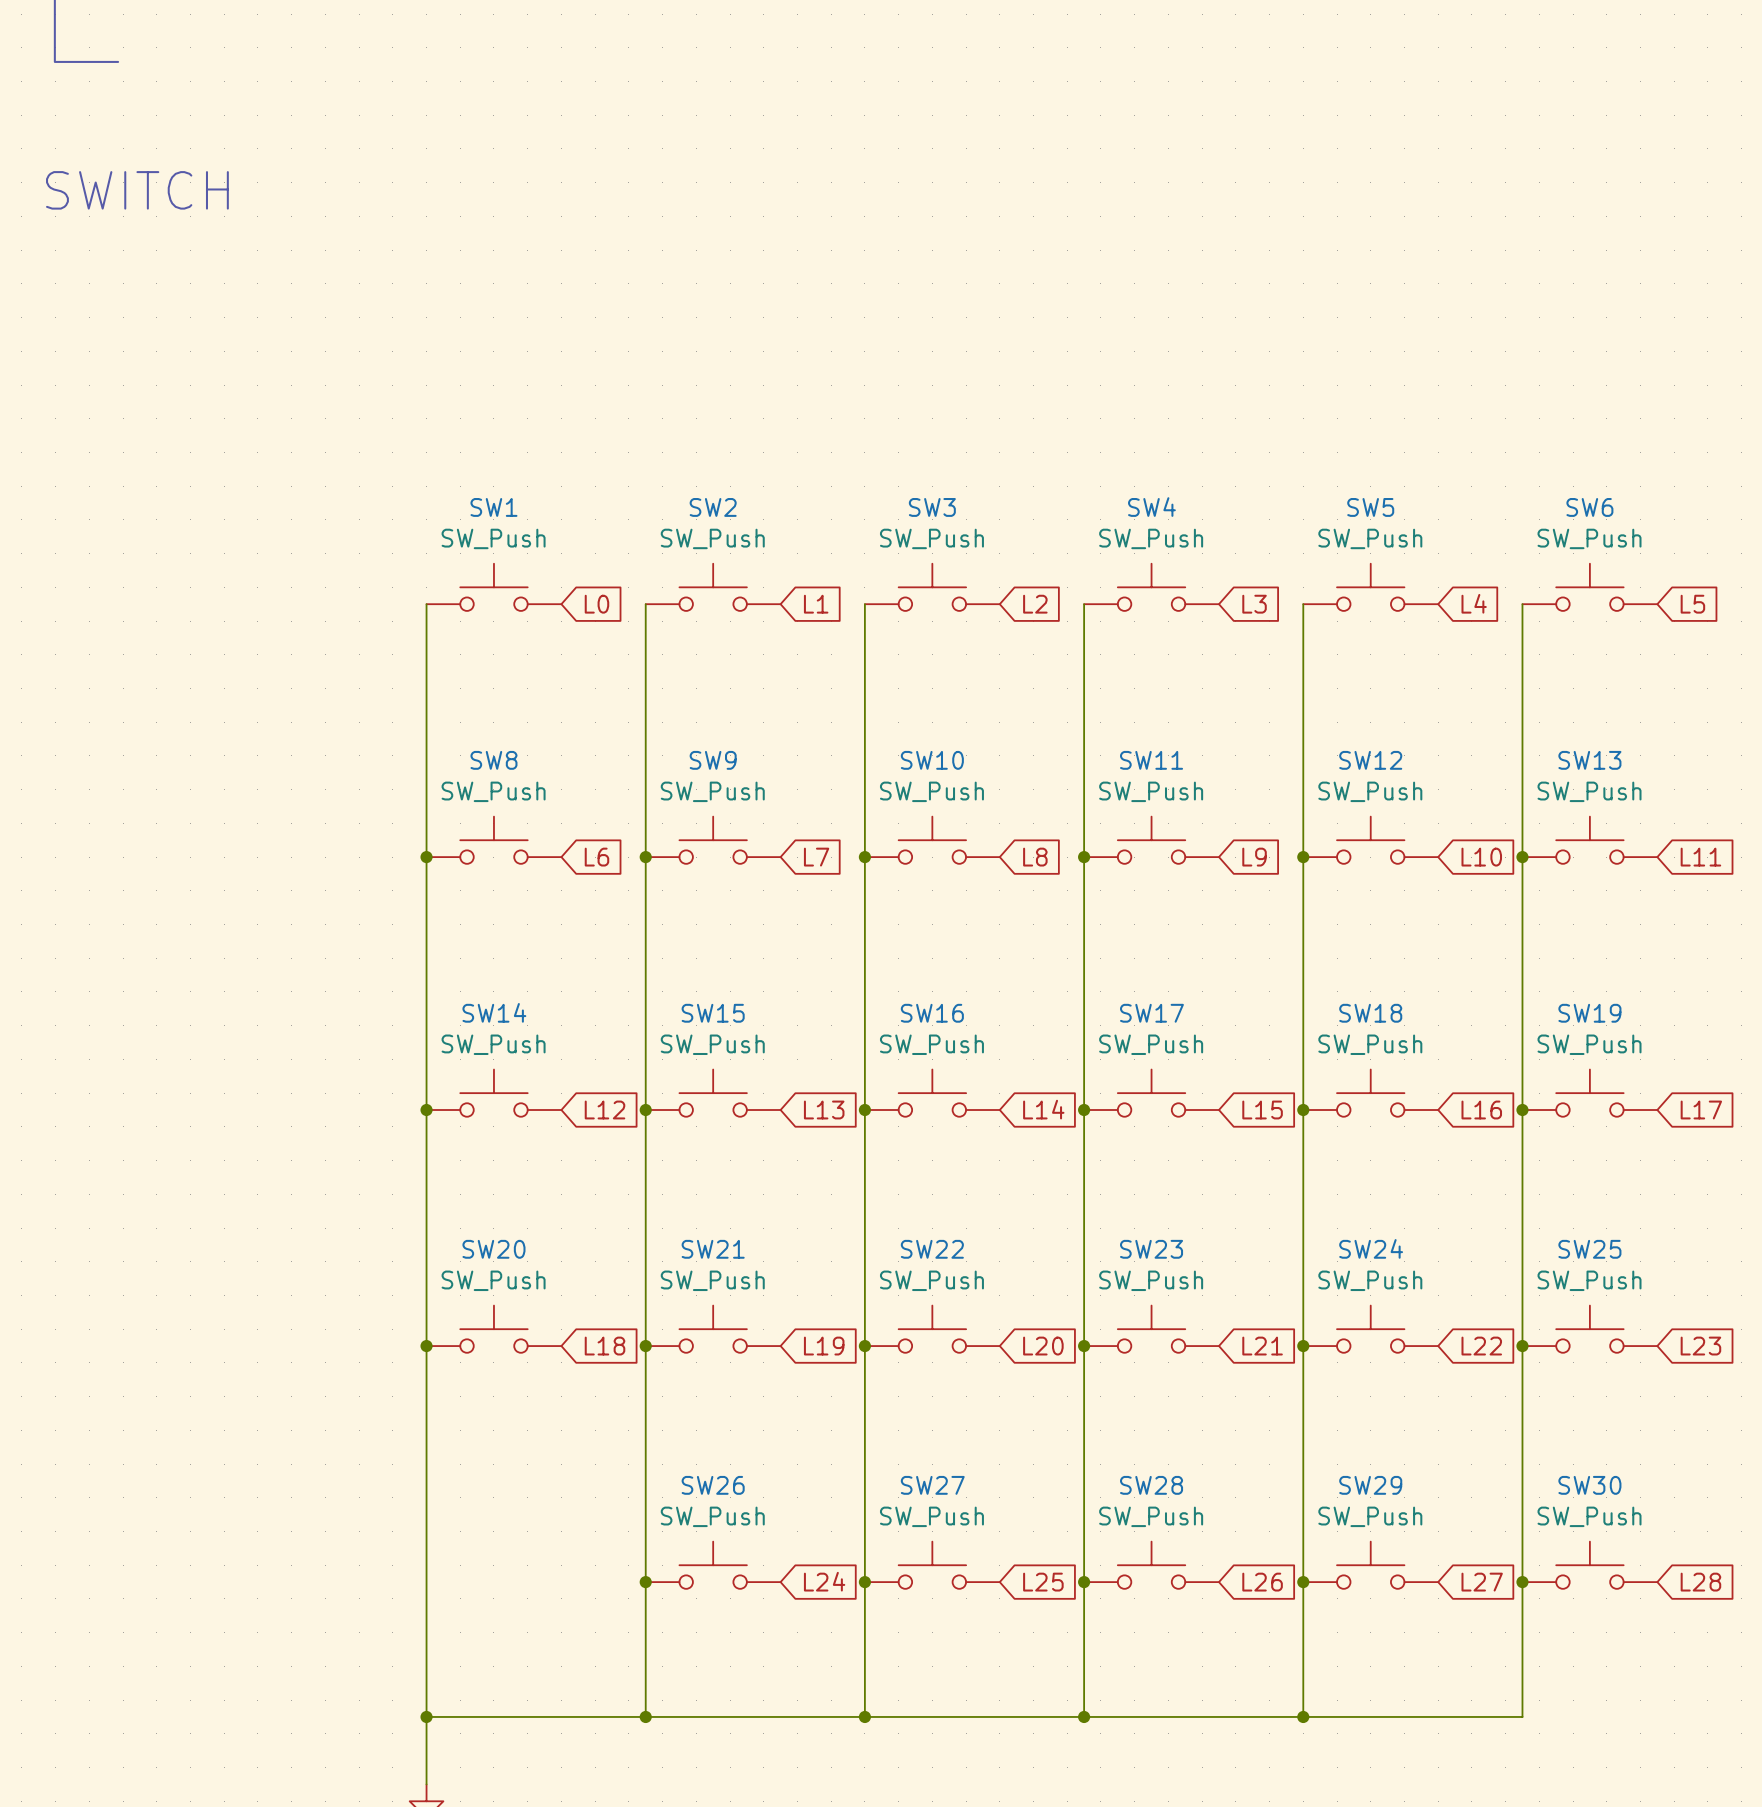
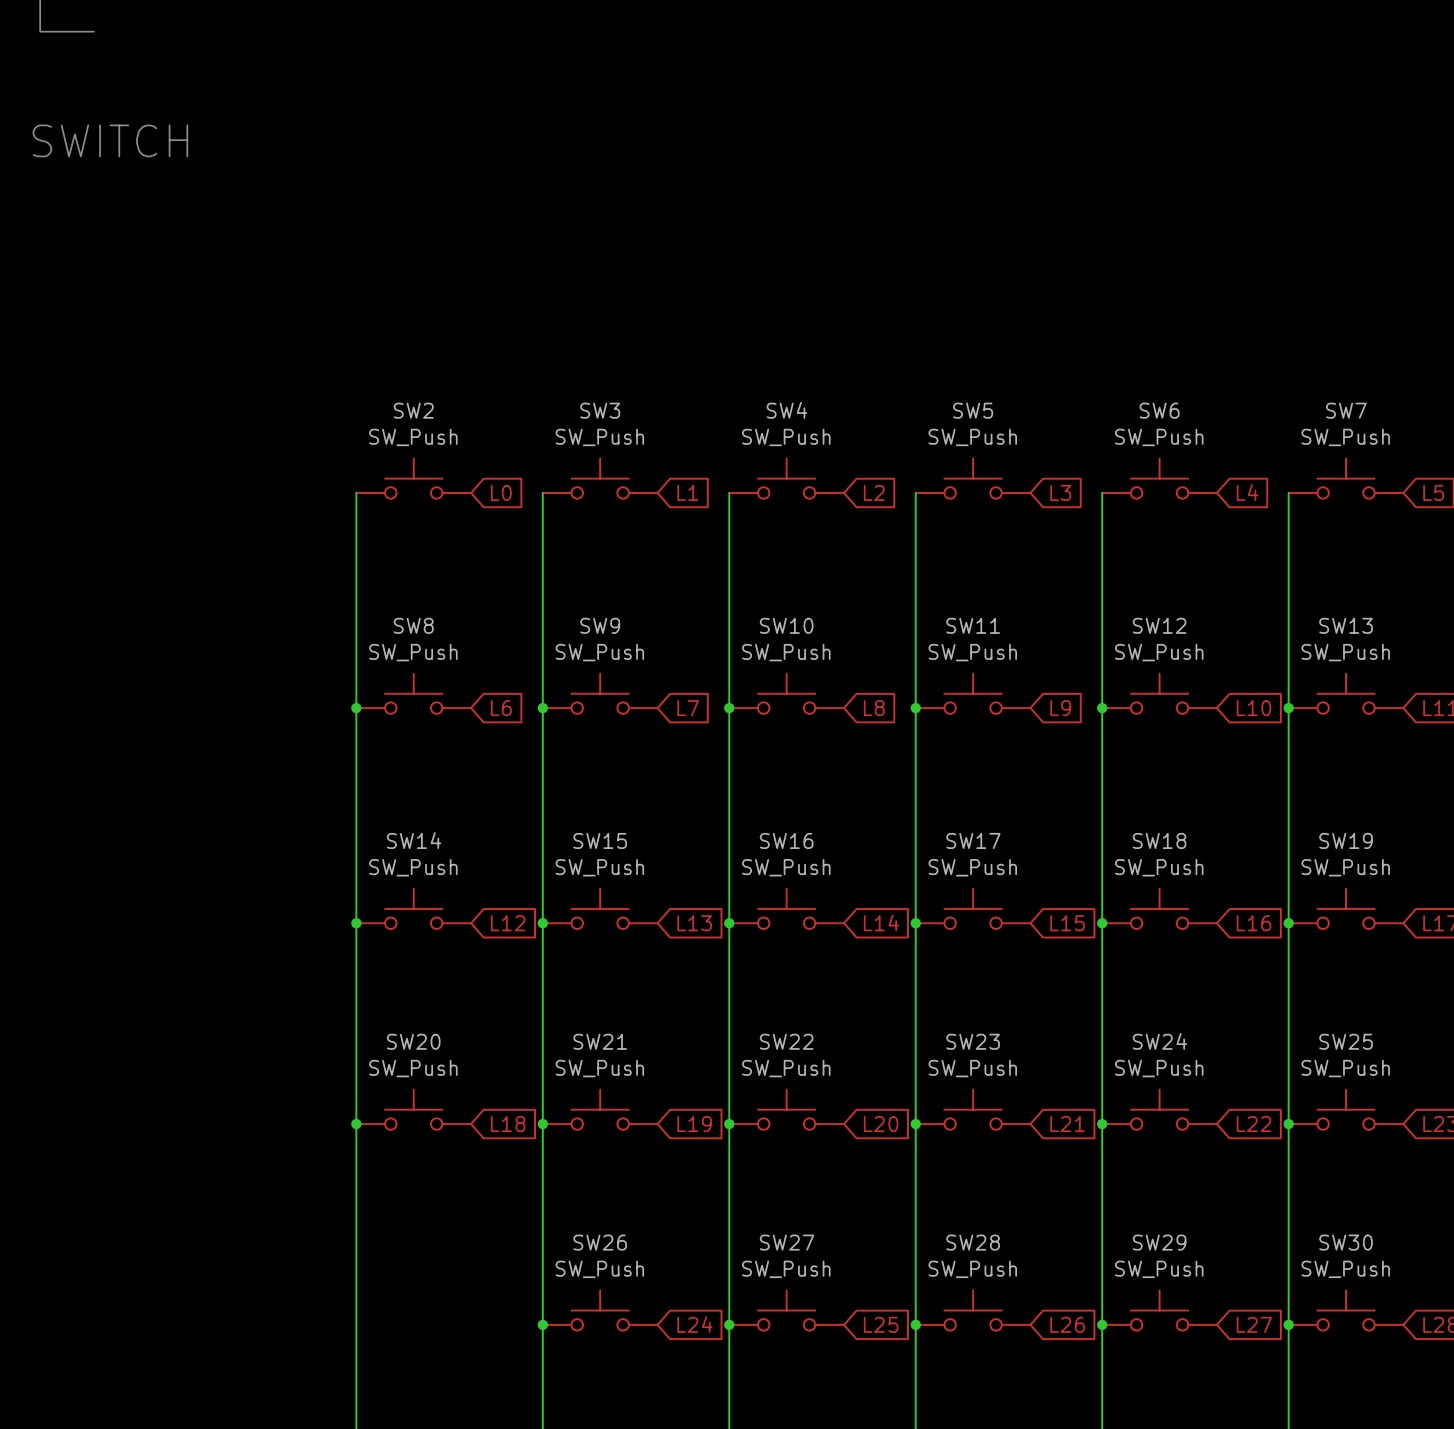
SW1 name: SW1 (493, 507) -> SW2 (413, 410)
SW2 name: SW2 (713, 507) -> SW3 (600, 410)
SW3 name: SW3 (932, 507) -> SW4 (786, 410)
SW4 name: SW4 (1151, 507) -> SW5 (973, 410)
SW5 name: SW5 (1370, 507) -> SW6 (1159, 410)
SW6 name: SW6 (1589, 507) -> SW7 (1346, 410)

